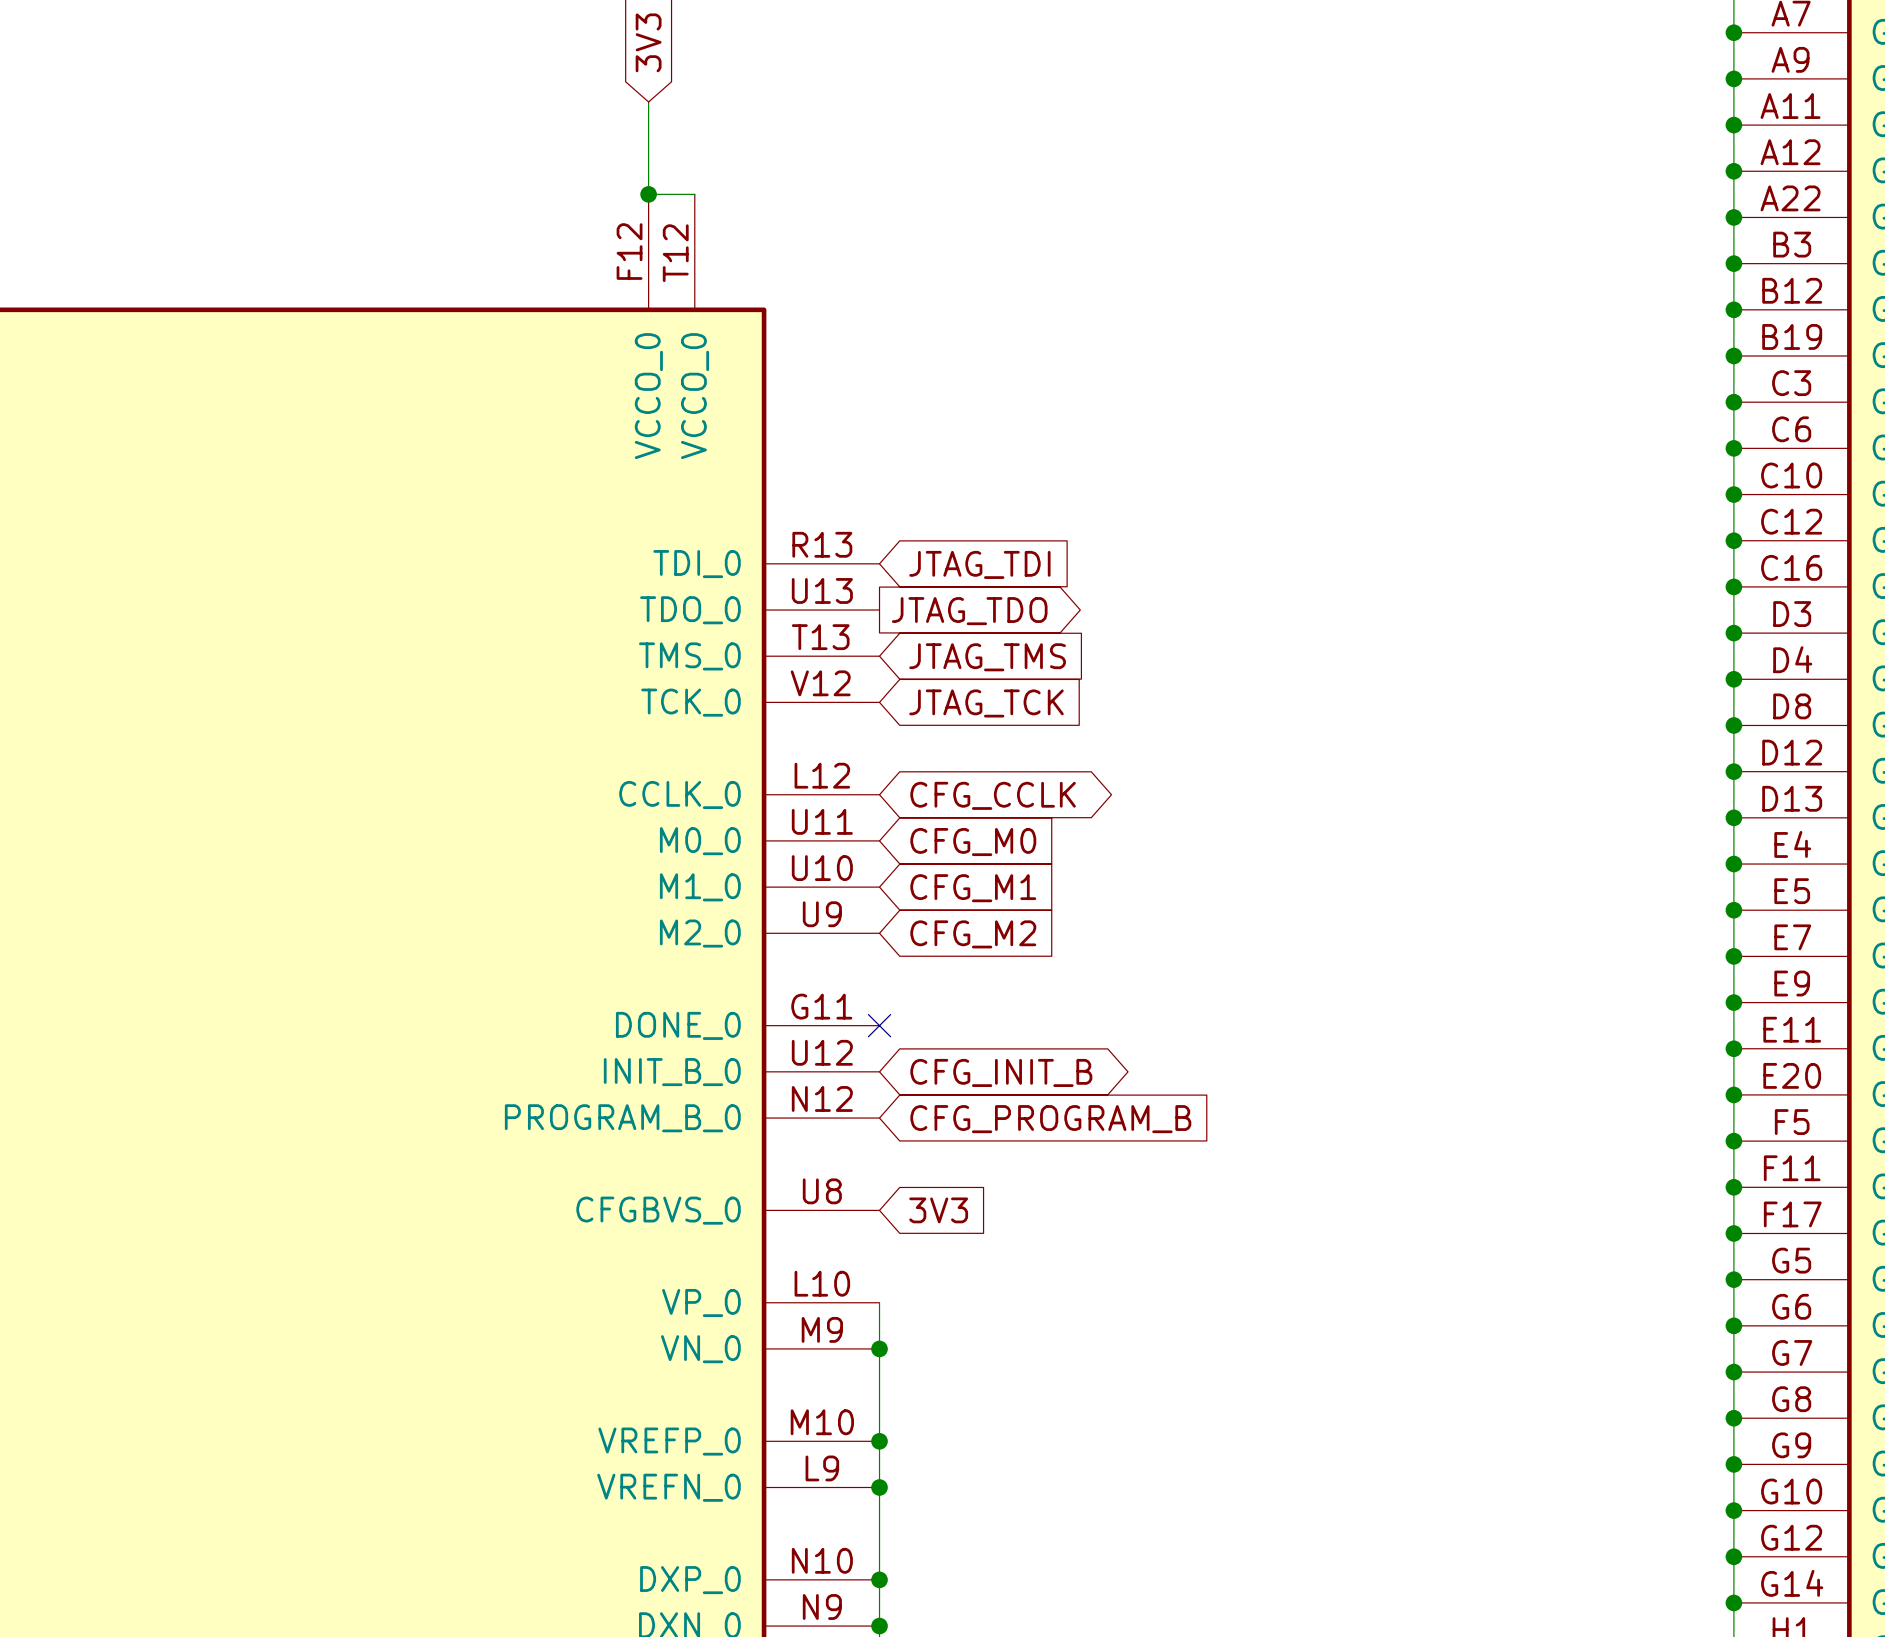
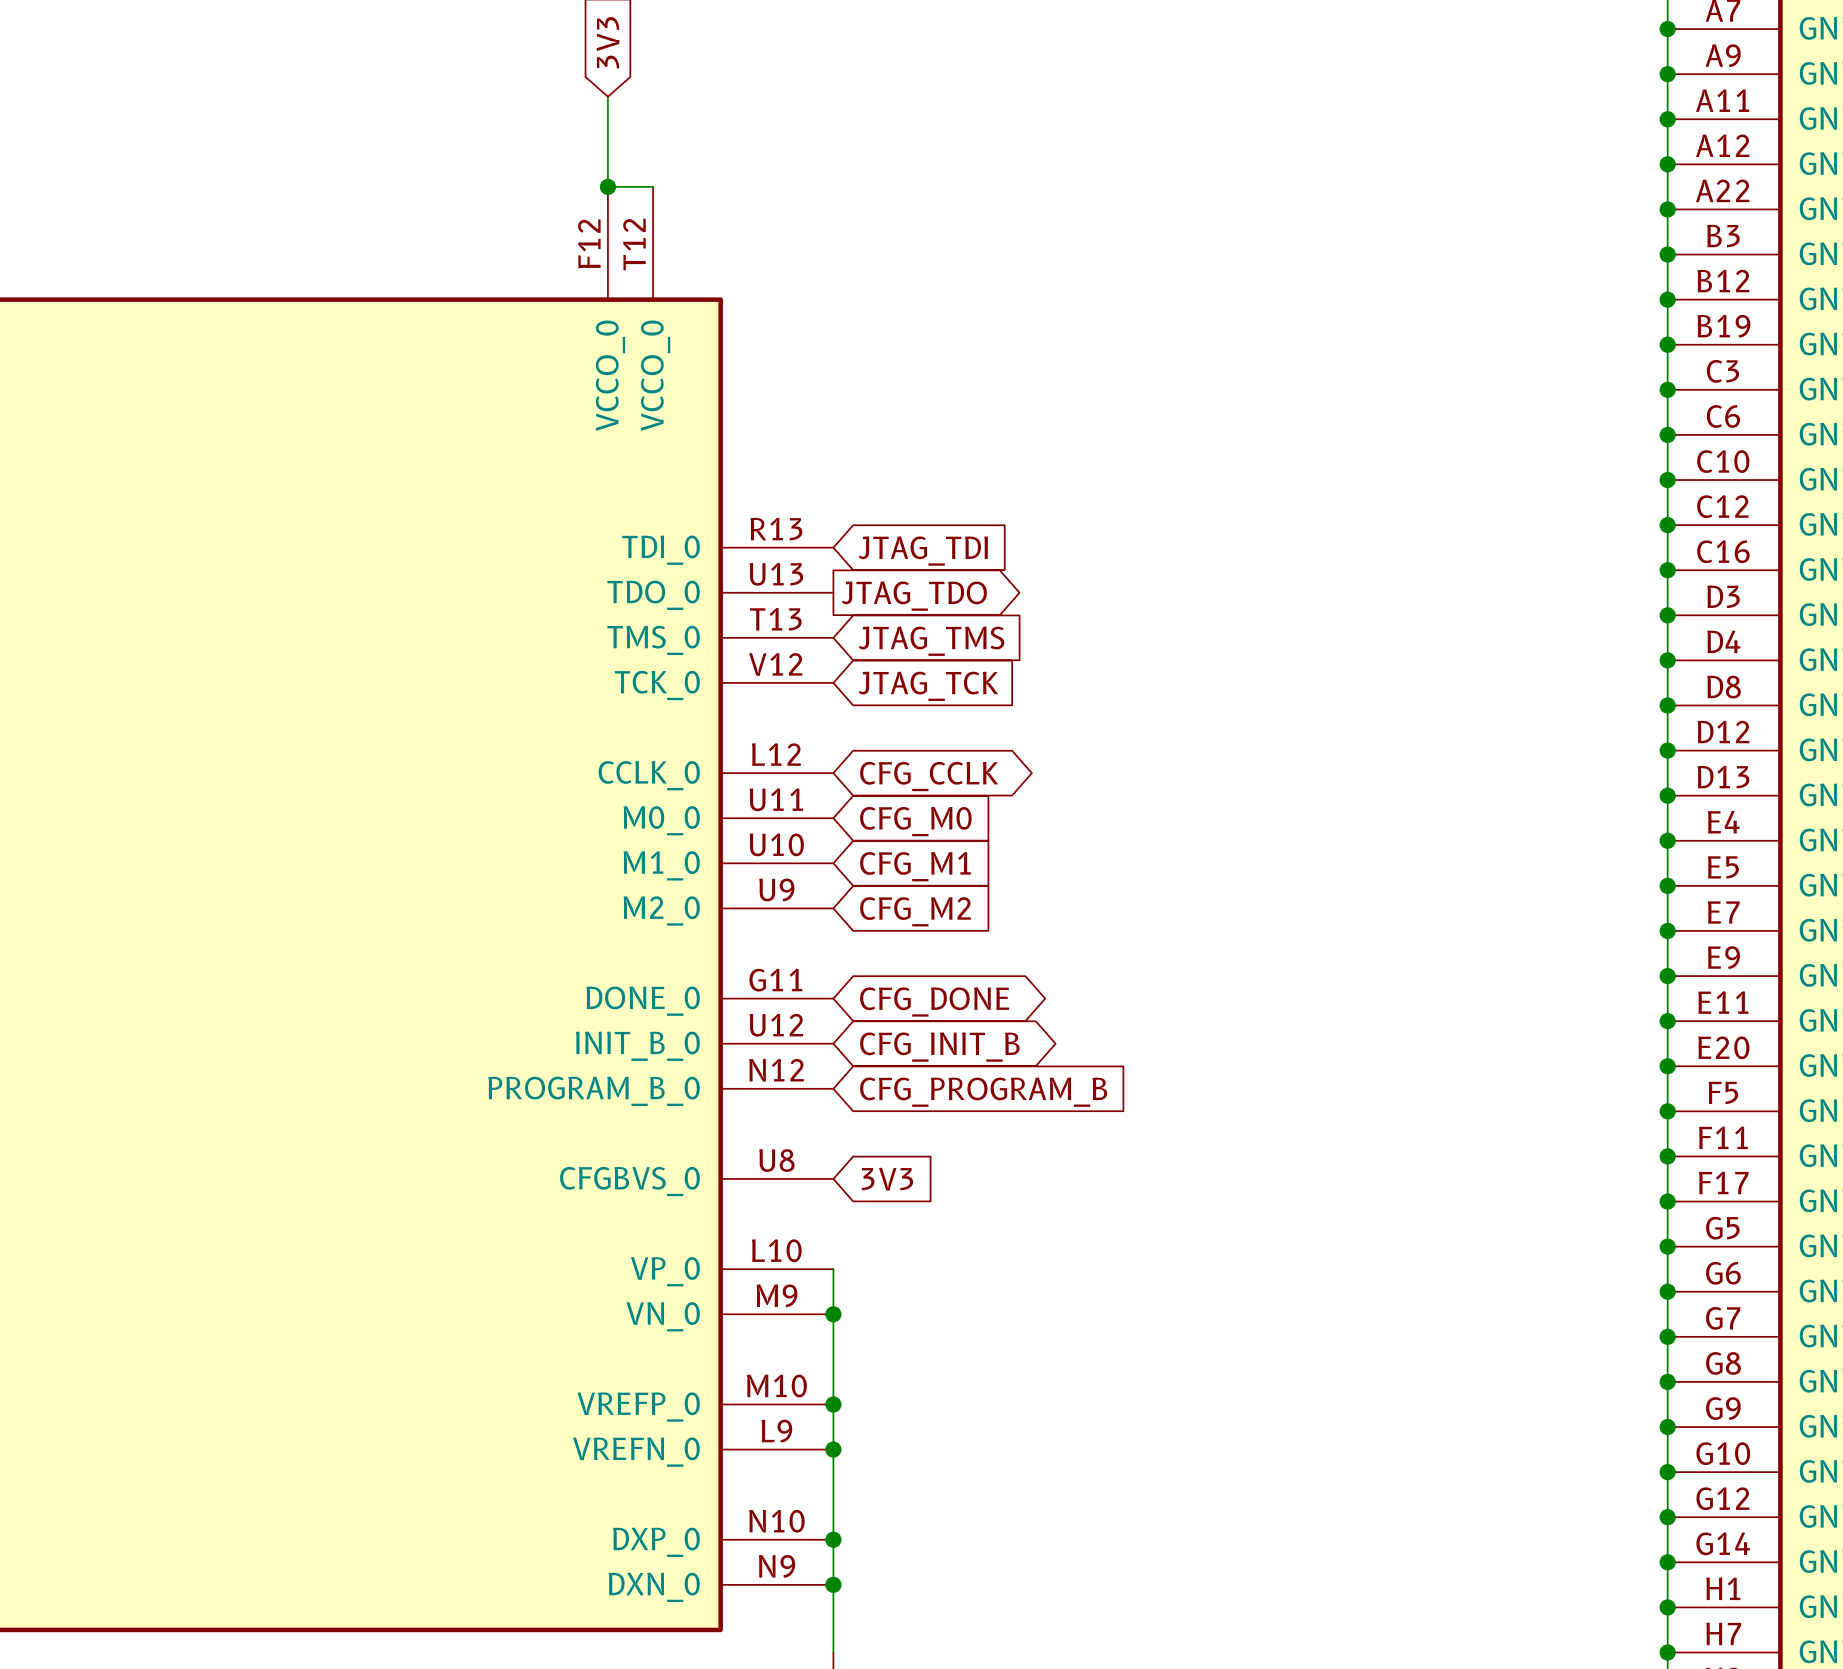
no-connect mark: (879, 1025) -> none
global label: none -> CFG_DONE (934, 1001)

